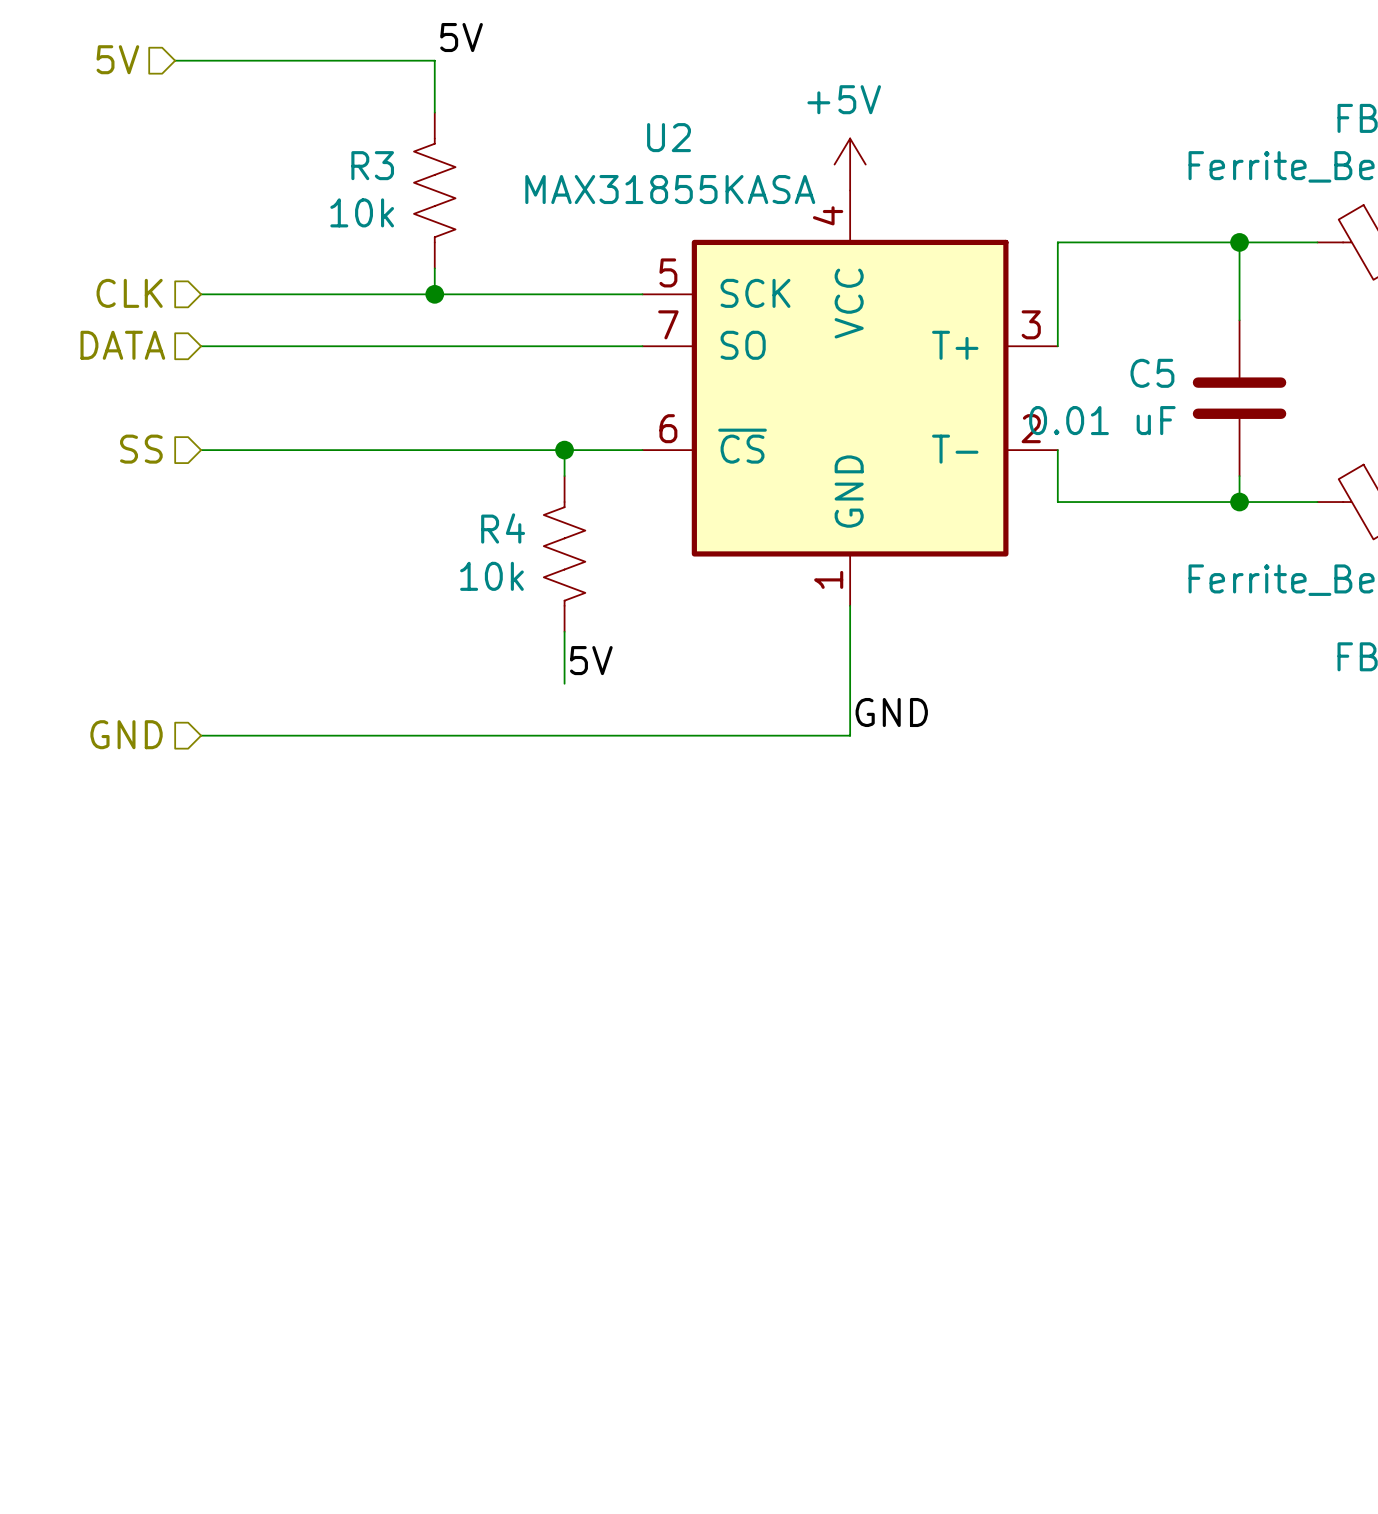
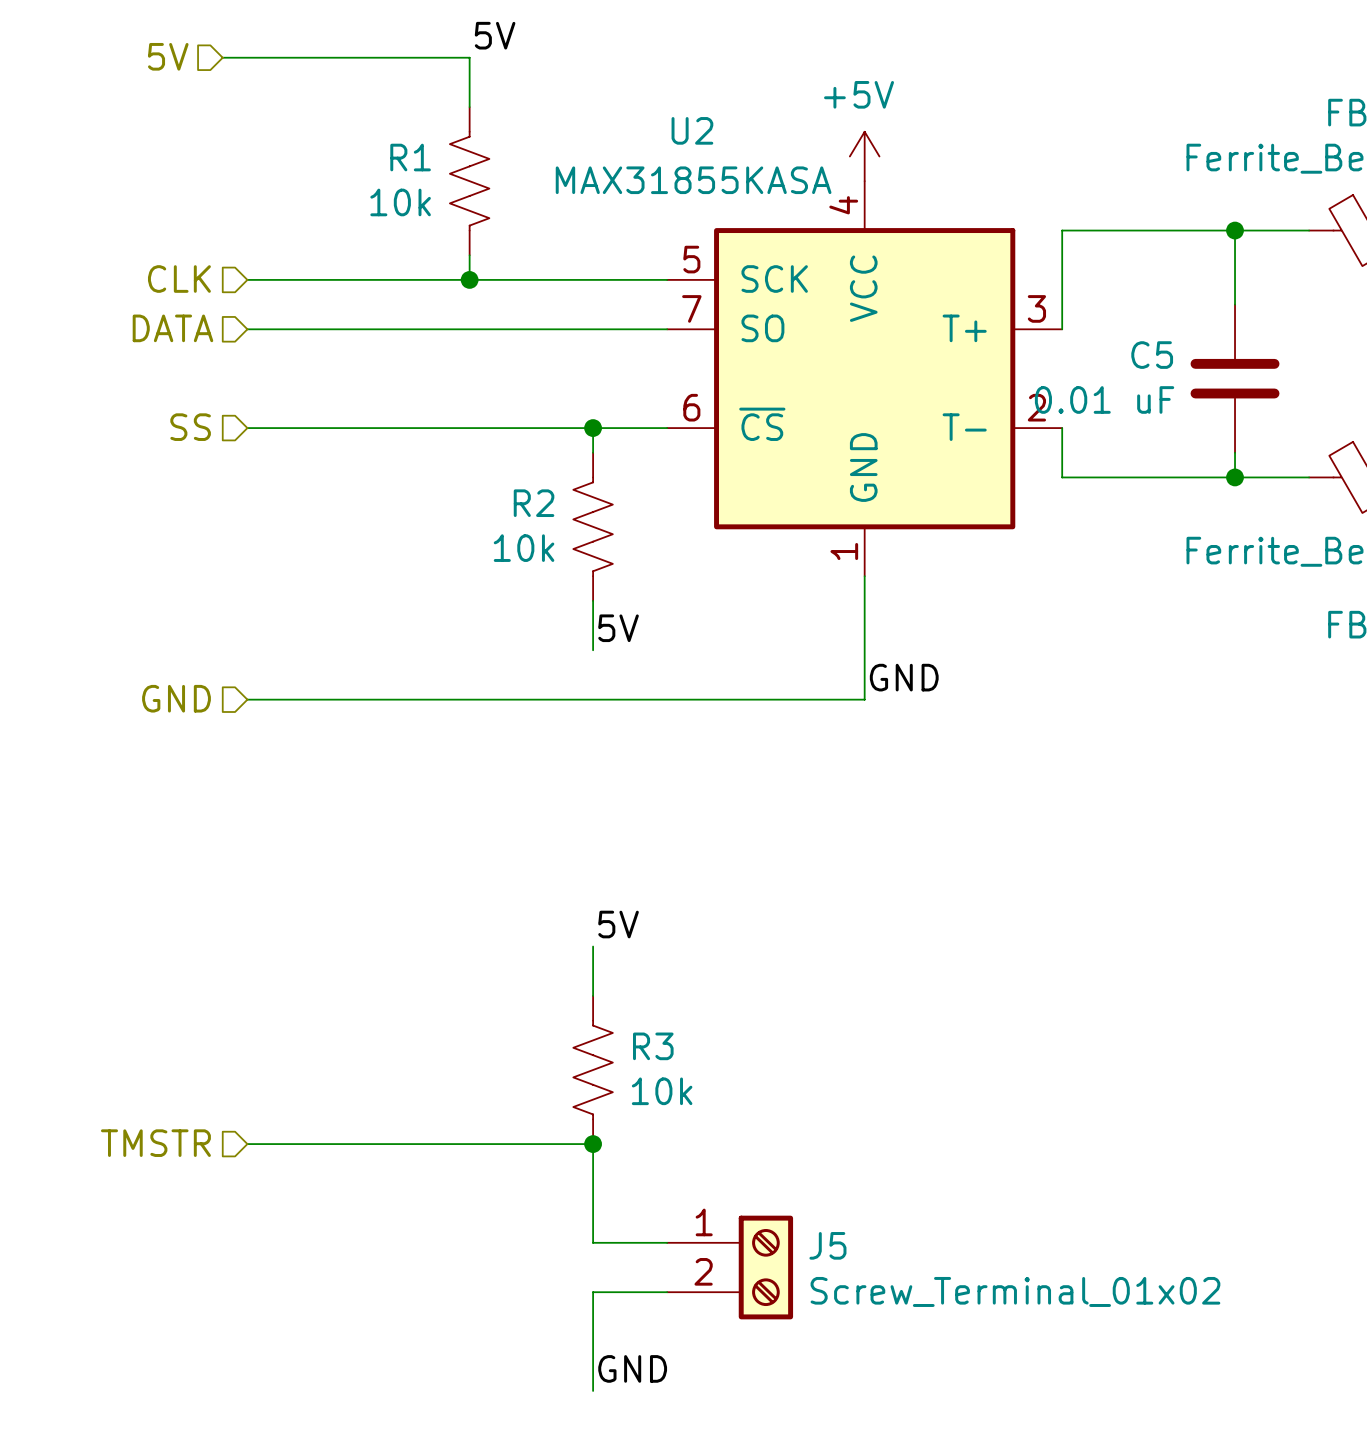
R3 name: R3 (372, 165) -> R1 (410, 157)
R4 name: R4 (503, 528) -> R2 (534, 503)
label: none -> 5V (618, 924)
wire: none -> (593, 946) (593, 995)
R3: none -> 10k (593, 1069)
hierarchical label: none -> TMSTR (155, 1143)
wire: none -> (247, 1144) (593, 1144) (593, 1242) (667, 1242)
junction: none -> (593, 1144)
J5: none -> Screw_Terminal_01x02 (730, 1267)
wire: none -> (667, 1292) (593, 1292) (593, 1390)
label: none -> GND (632, 1368)

